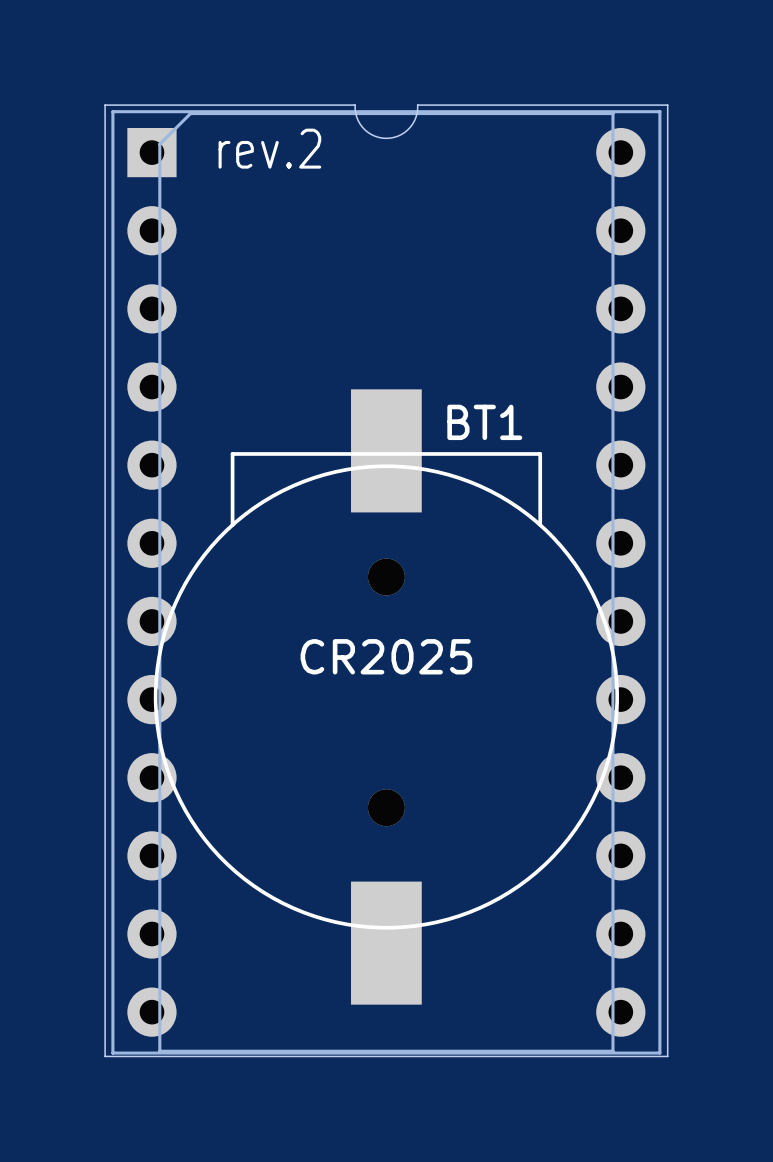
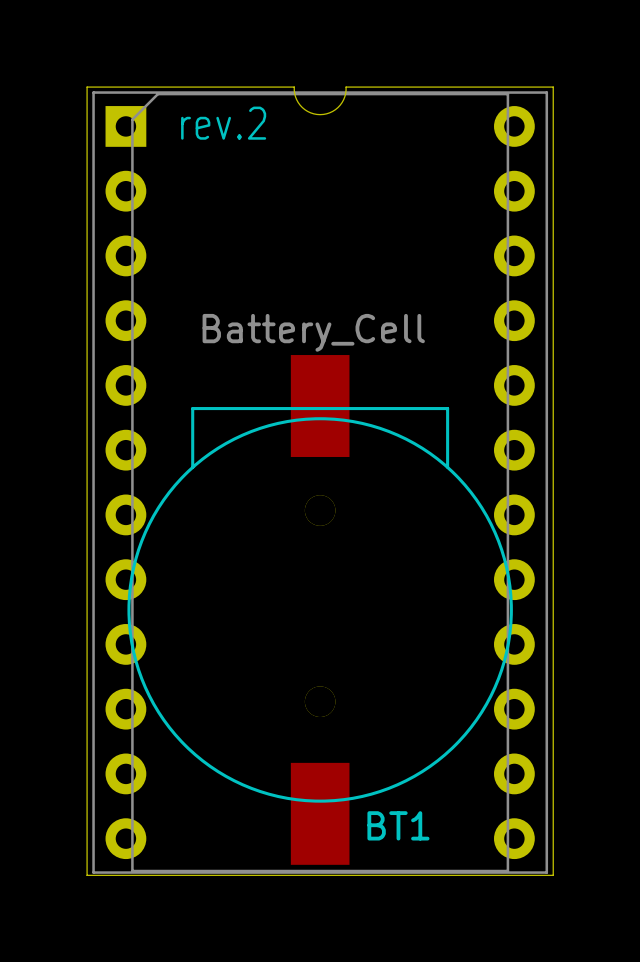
BT1 name position: BT1 (484, 422) -> BT1 (398, 825)
BT1 value: CR2025 (386, 656) -> Battery_Cell (313, 332)
BT1 position: (386, 697) -> (320, 609)

